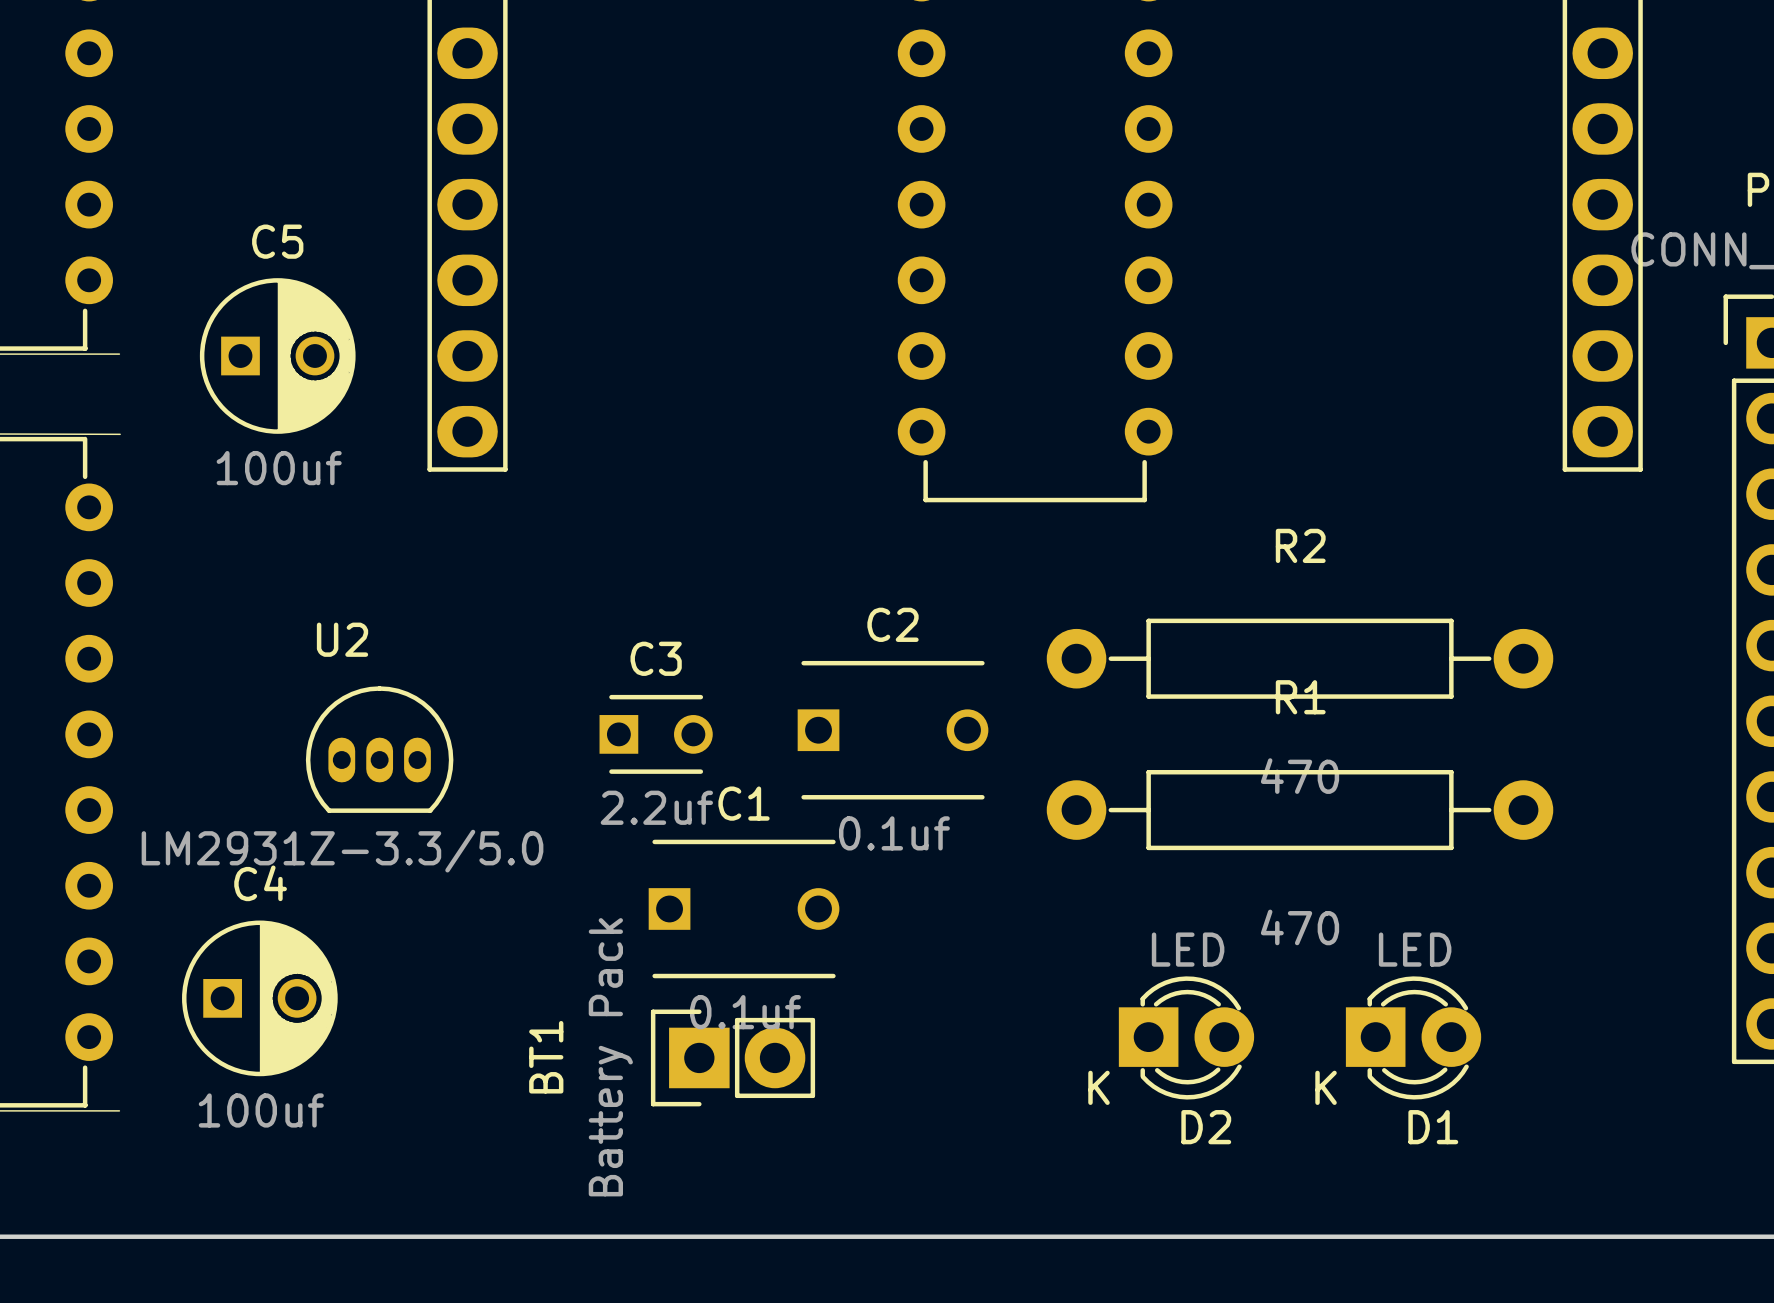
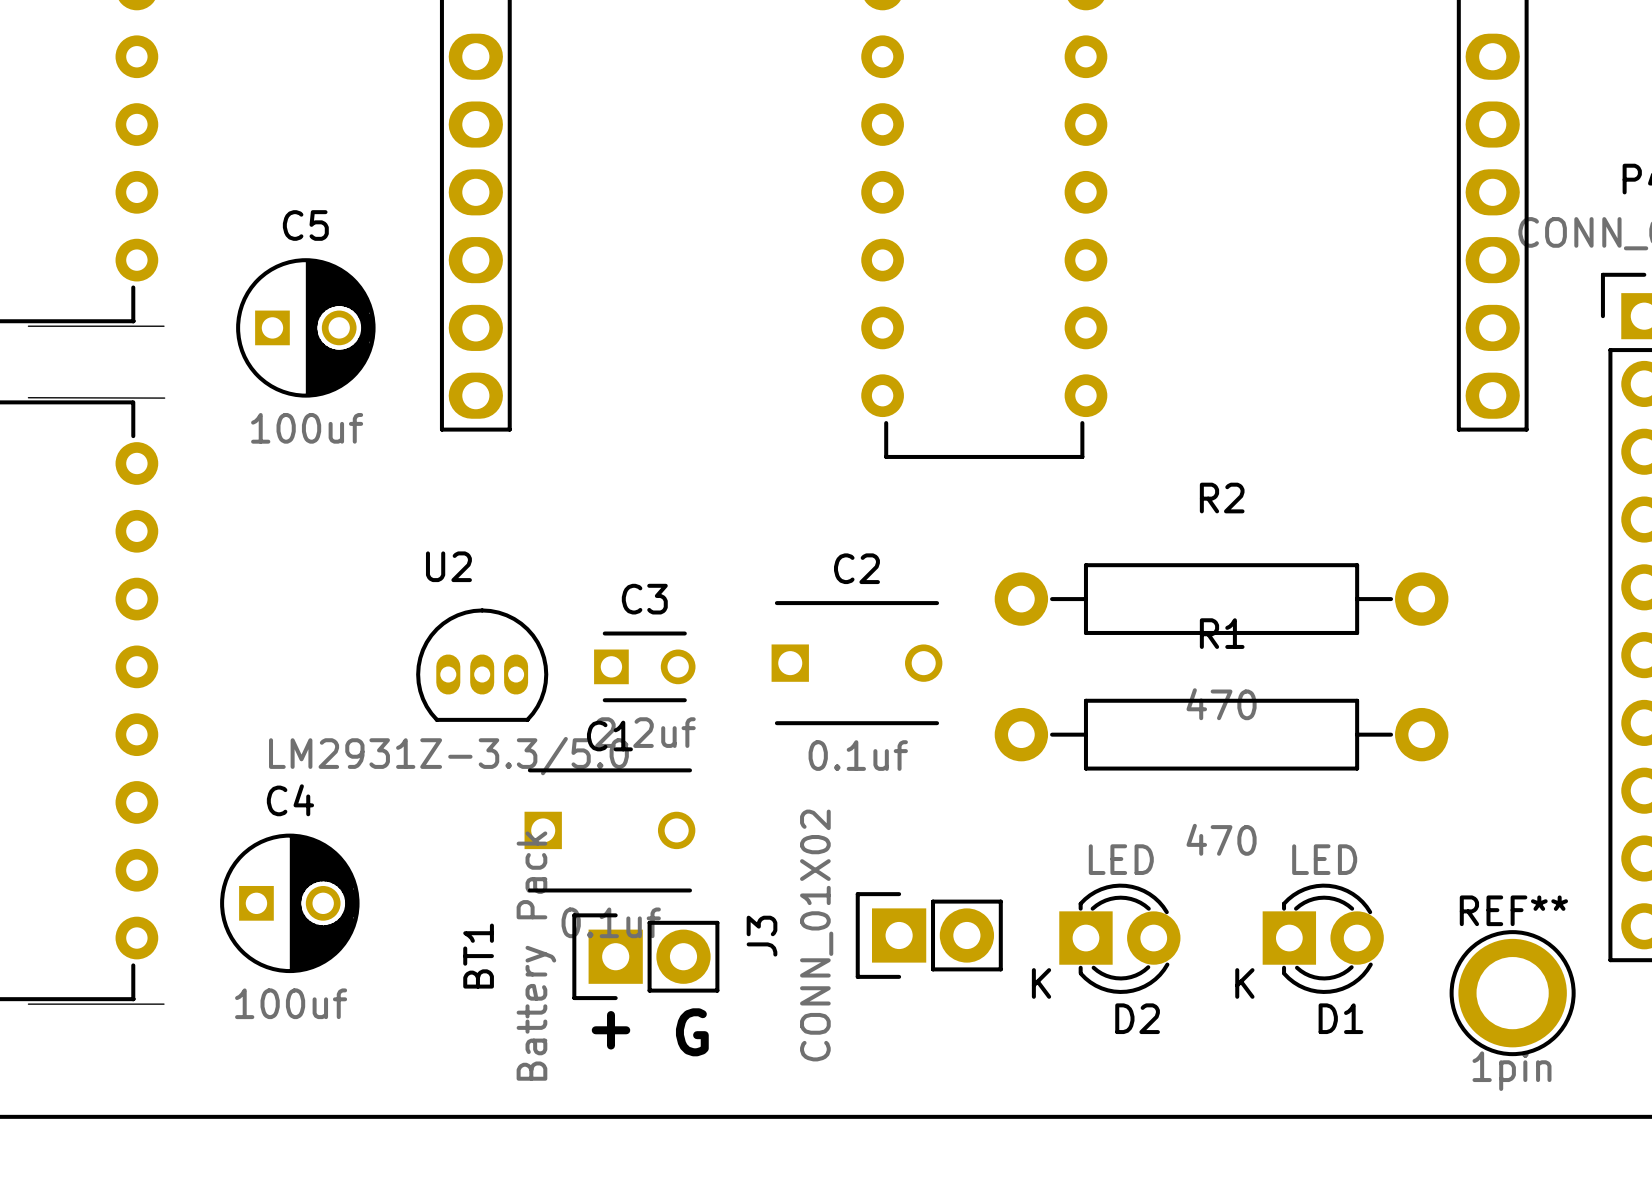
U2 position: (379, 749) -> (482, 665)
C1 position: (744, 908) -> (609, 830)
J3: none -> CONN_01X02 (929, 935)
BT1 position: (733, 1057) -> (645, 956)
REF**: none -> 1pin (1512, 993)
text: none -> + (611, 1030)
text: none -> G (692, 1032)

